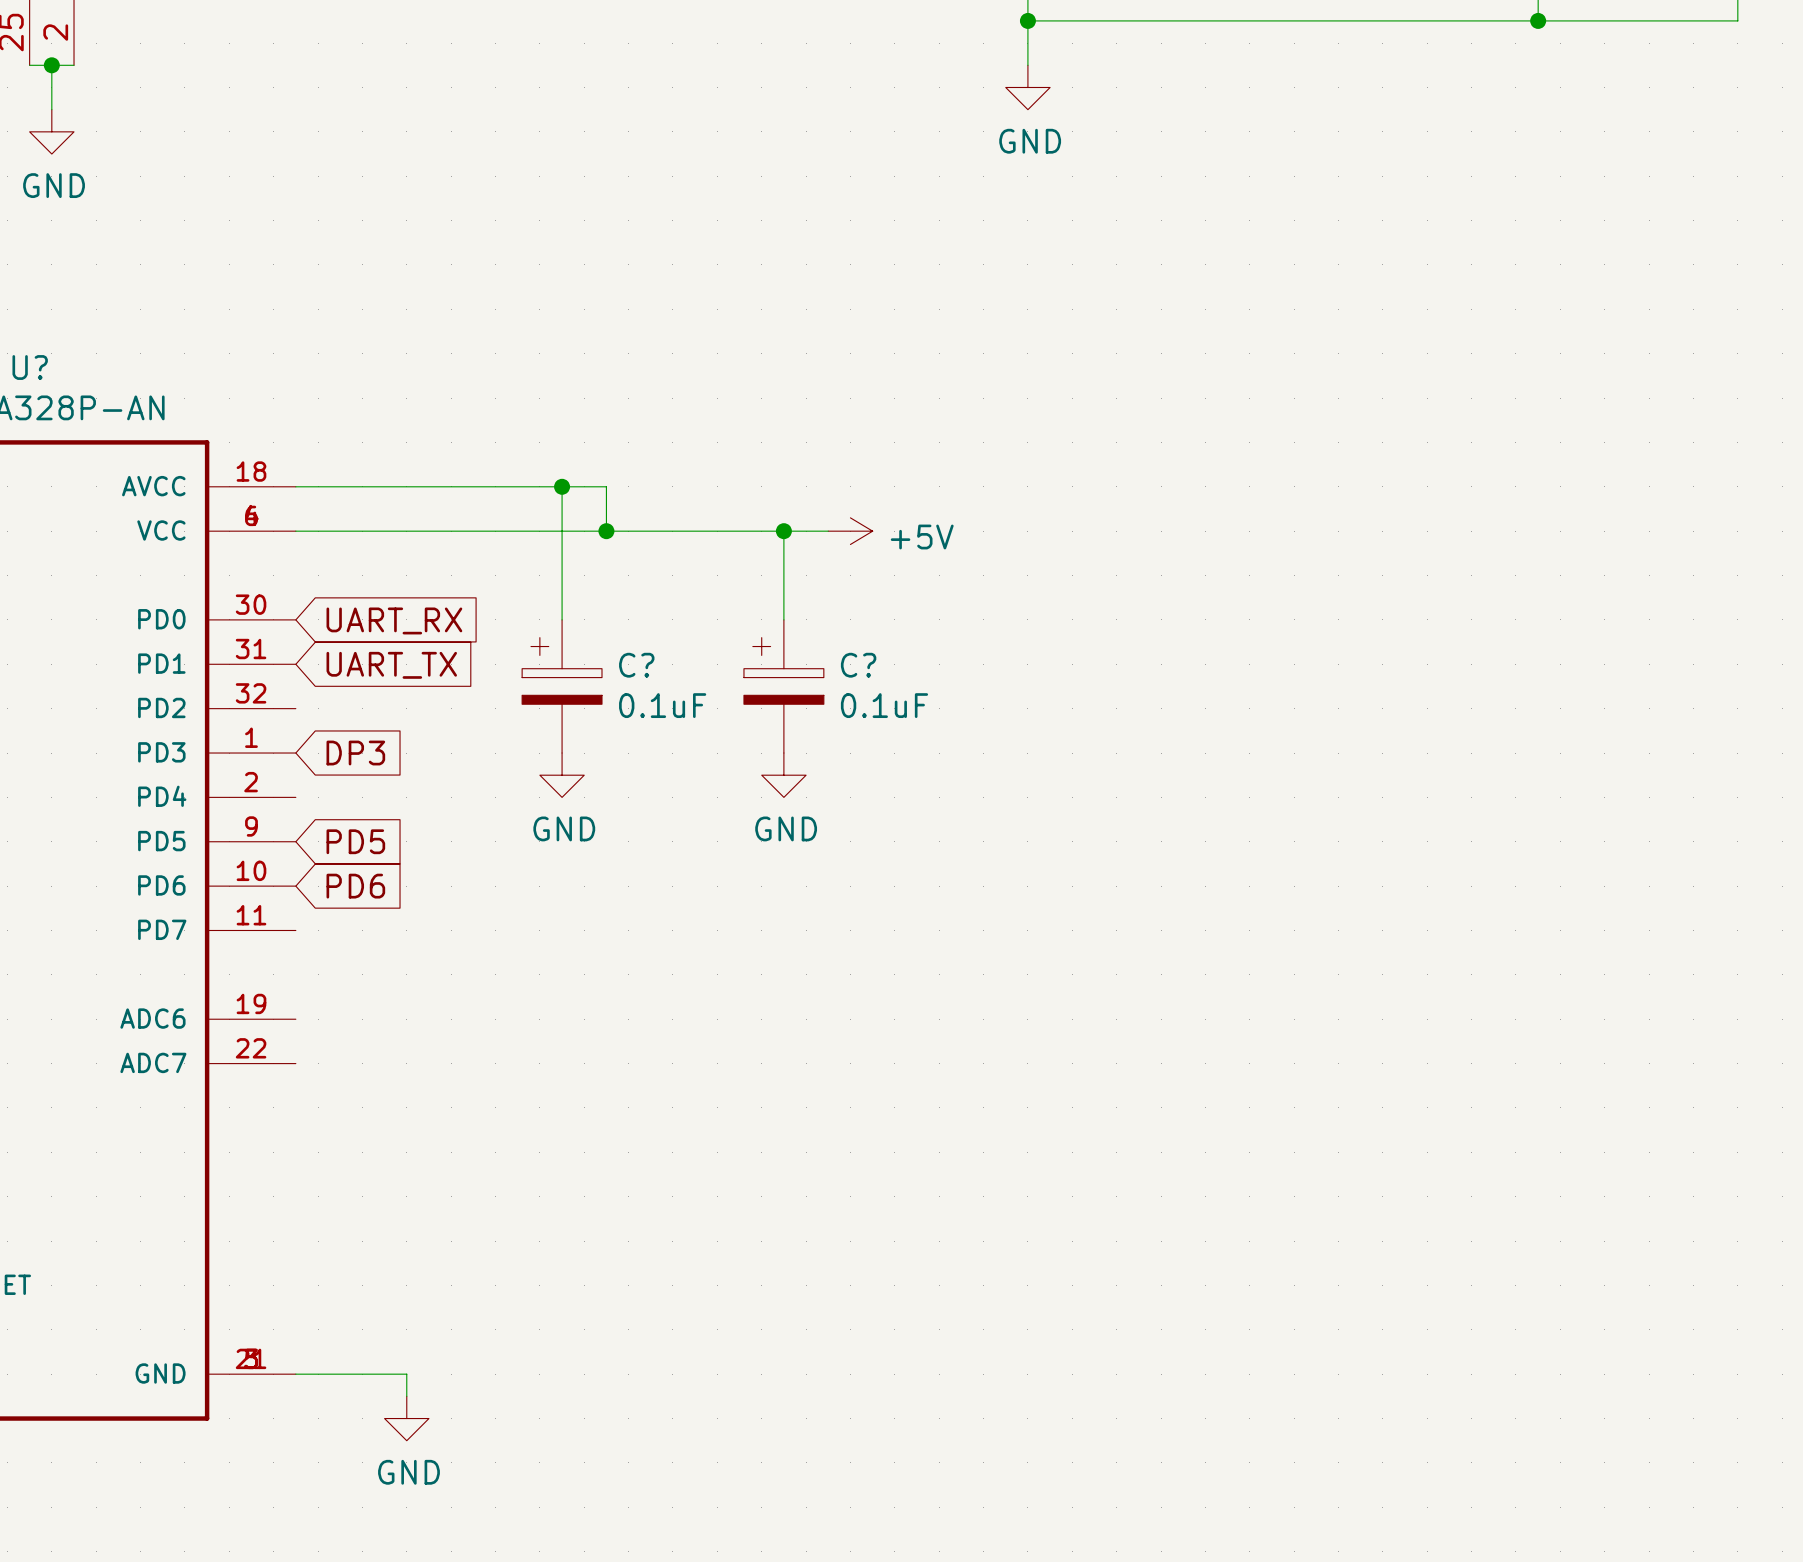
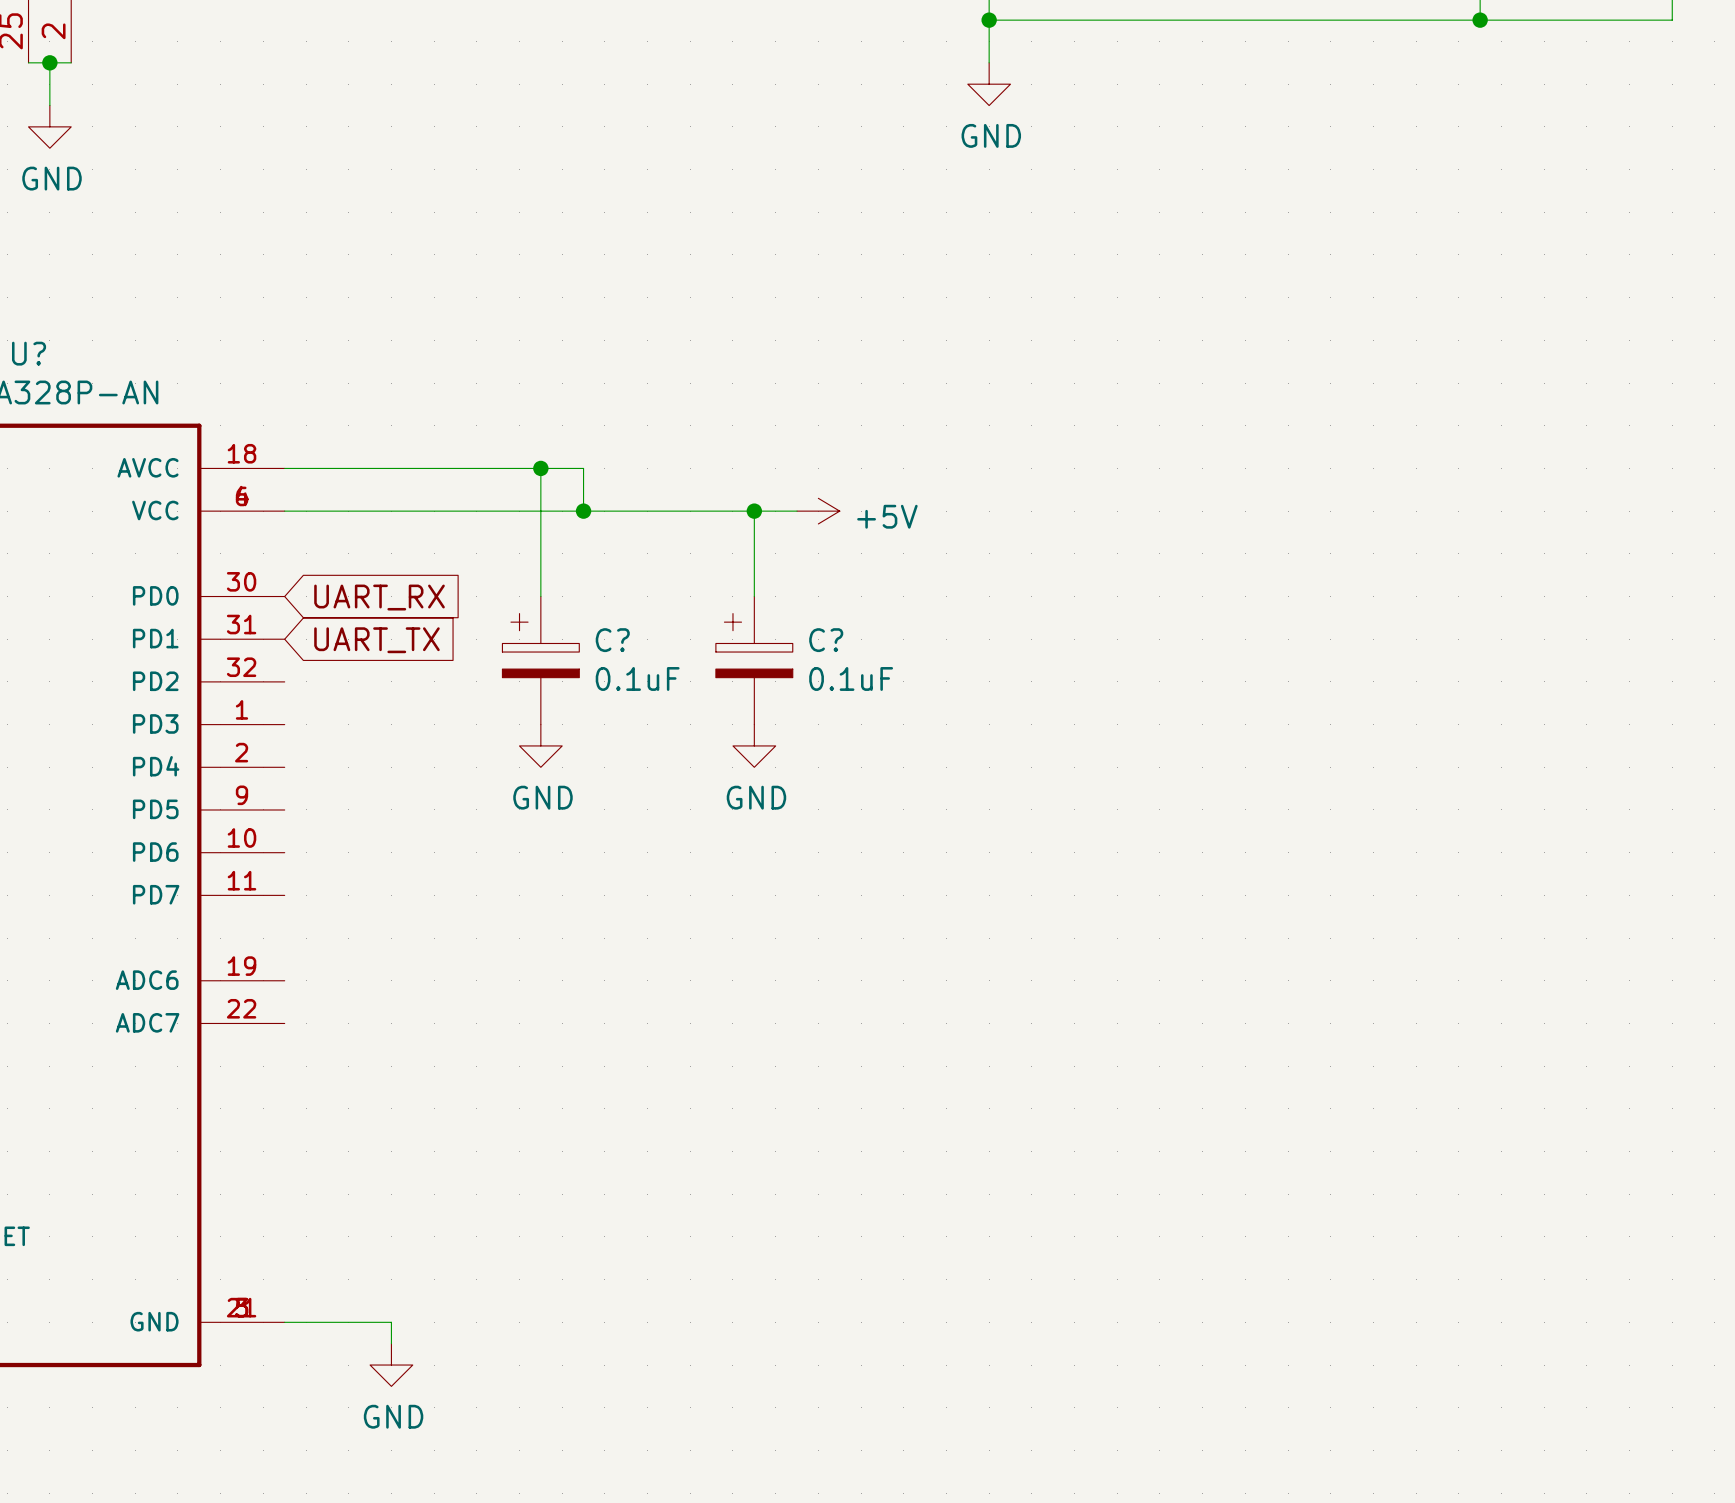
global label: DP3 (355, 753) -> none
global label: PD5 (355, 841) -> none
global label: PD6 (355, 886) -> none

